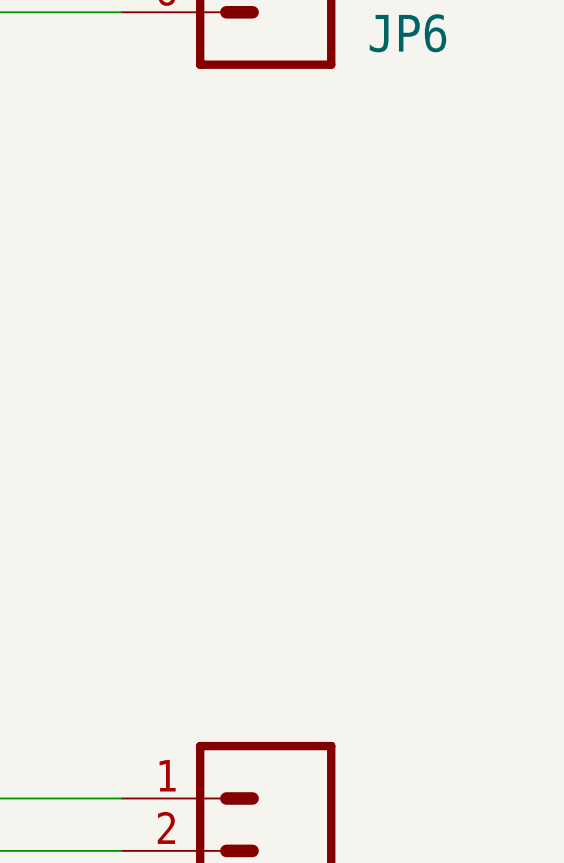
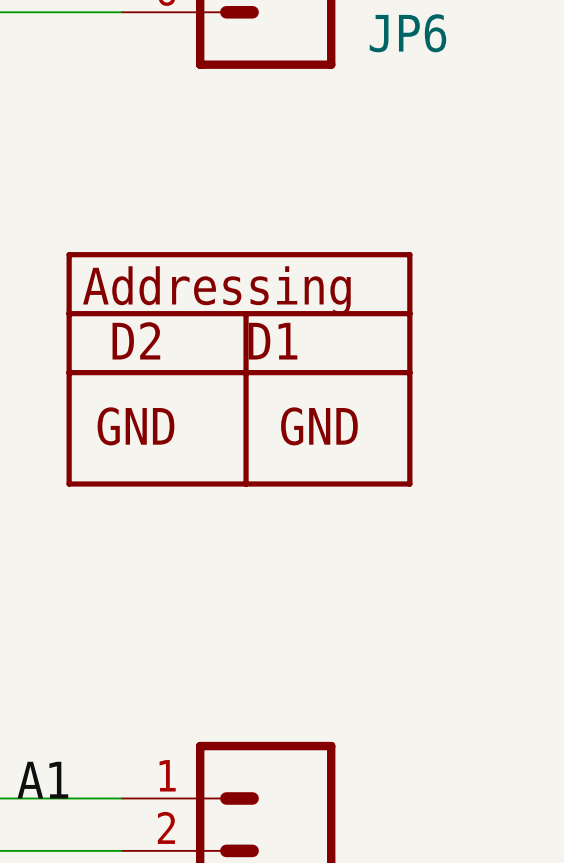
GND: none -> GND (239, 369)
label: none -> A1 (42, 780)

